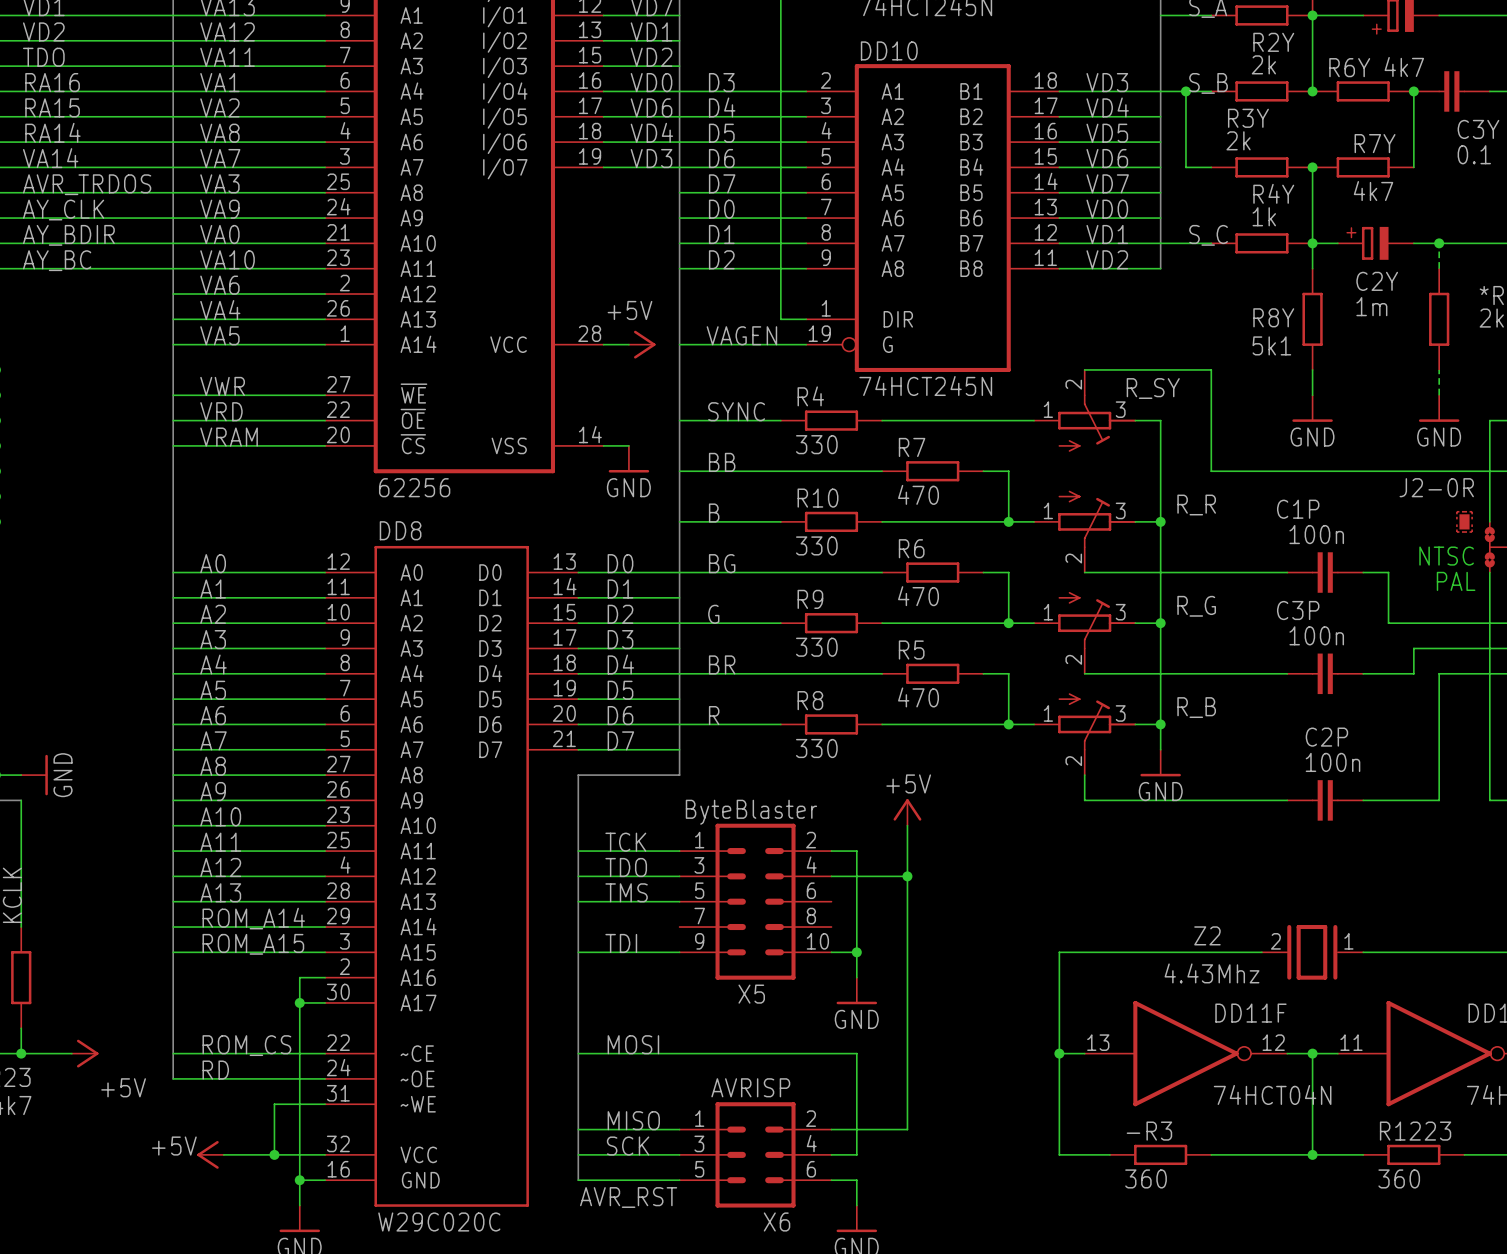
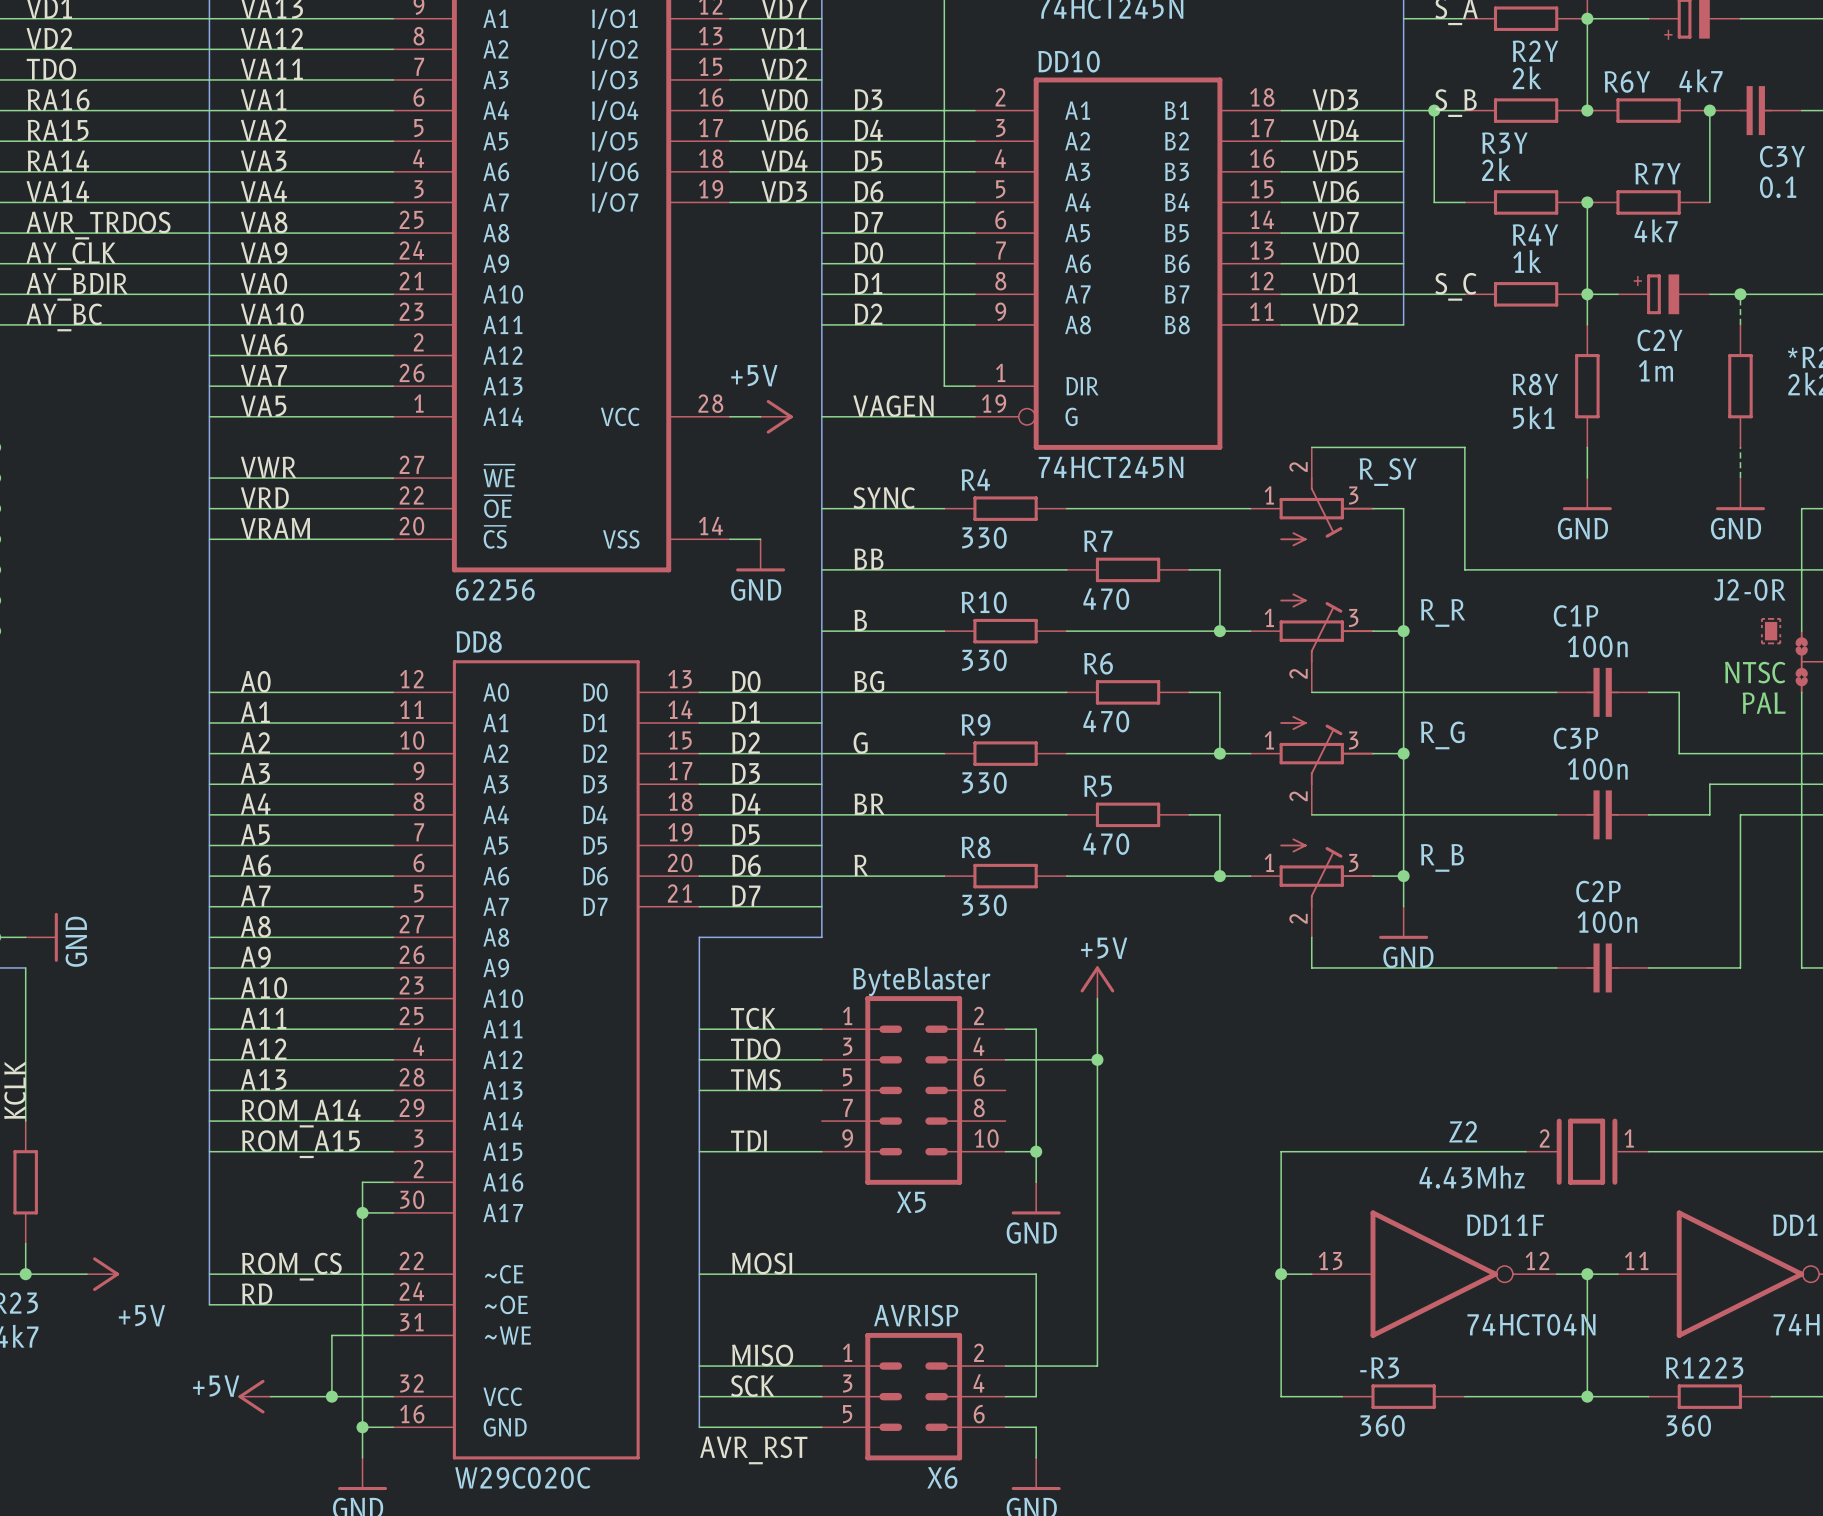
label: VA8 (219, 133) -> VA3 (263, 161)
label: VA7 (220, 158) -> VA4 (263, 191)
label: VA3 (219, 183) -> VA8 (264, 222)
label: VA4 (220, 310) -> VA7 (263, 375)

